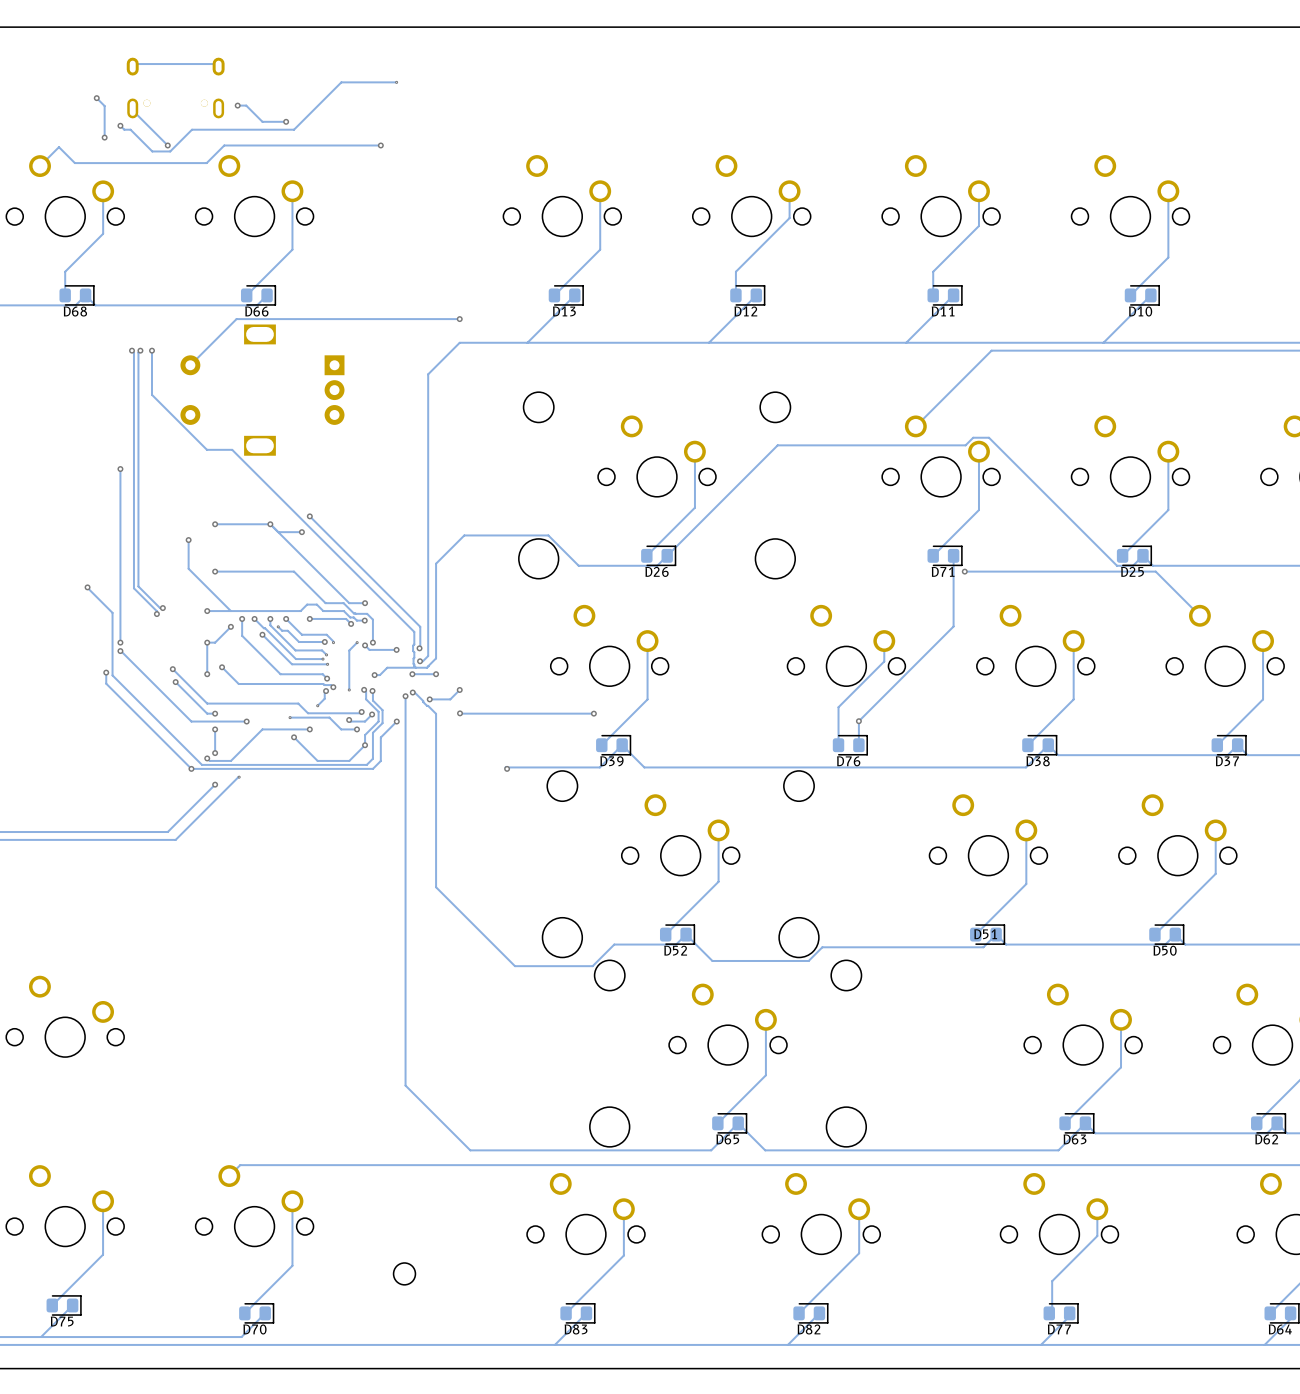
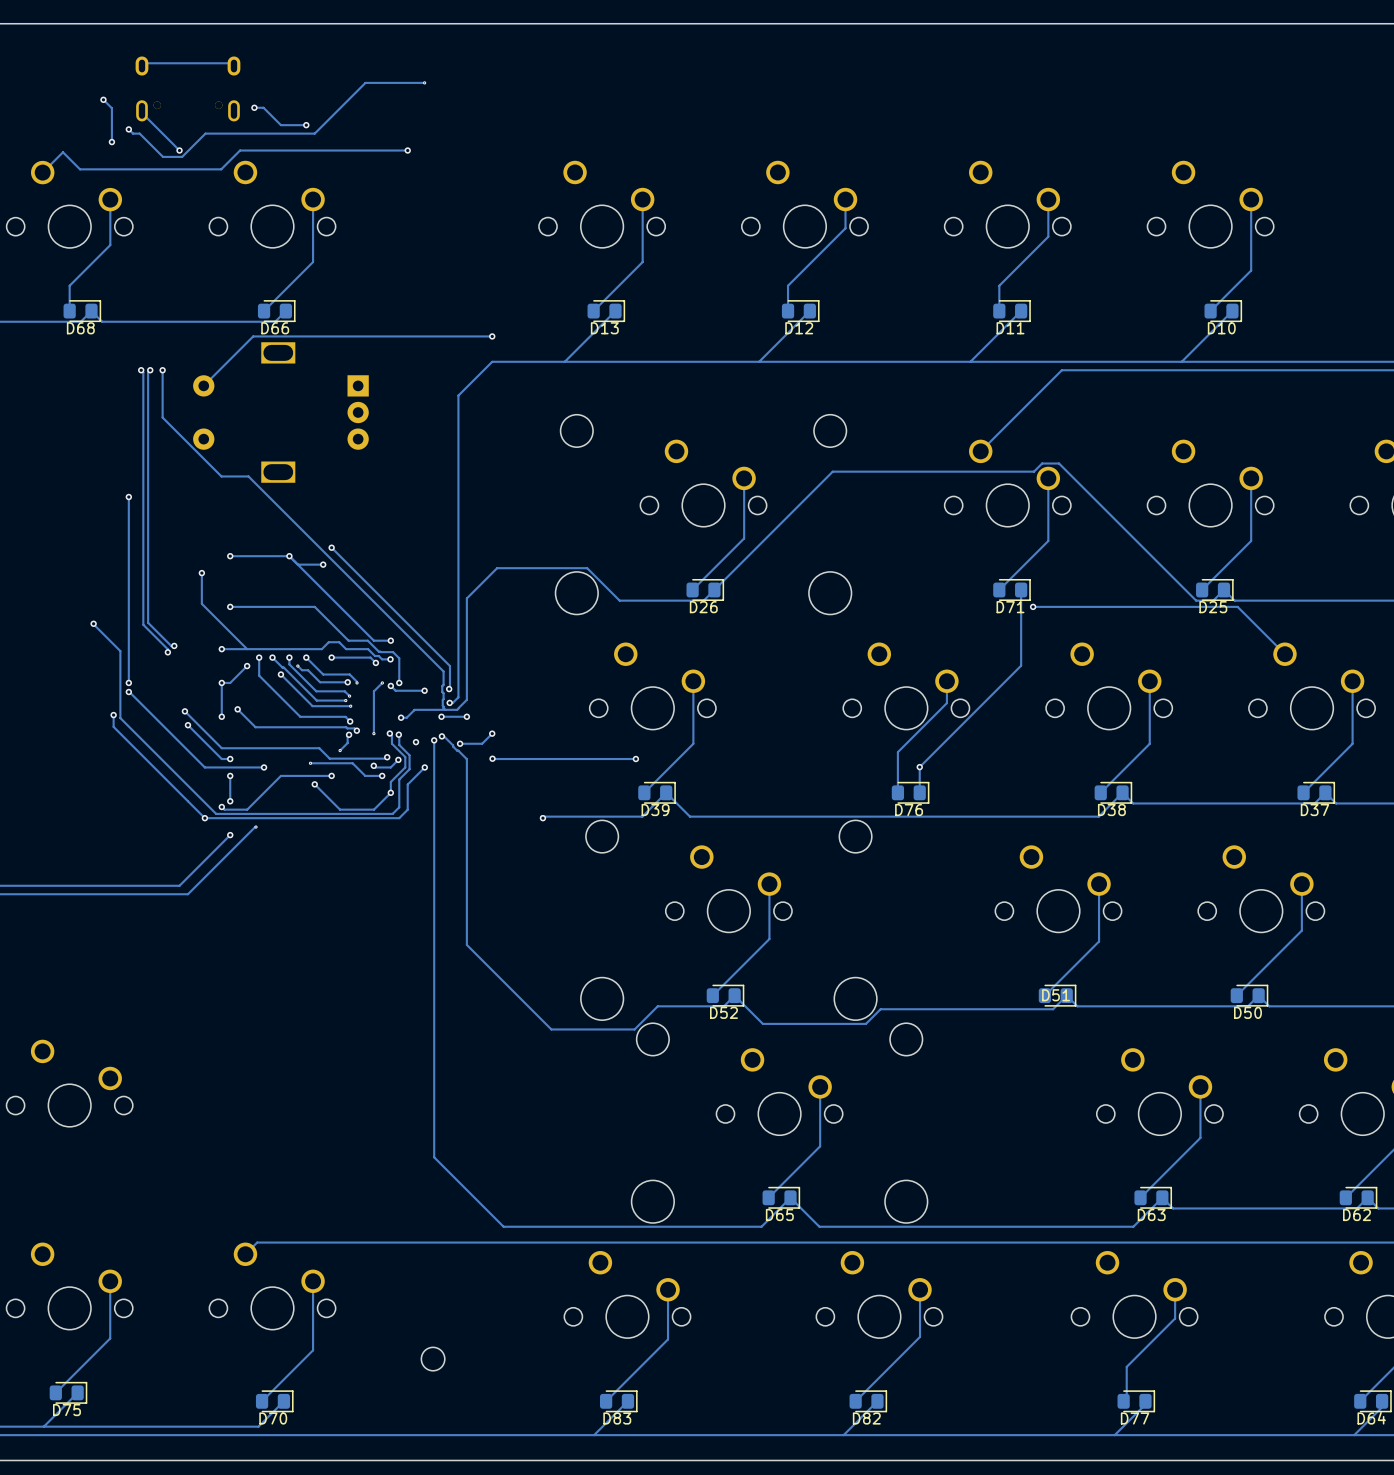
via: none -> (416, 742)

